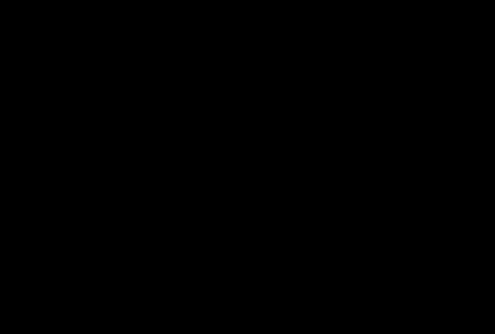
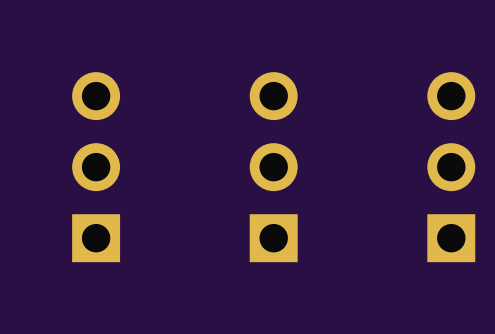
part: none -> (96, 167)
part: none -> (273, 167)
part: none -> (451, 167)

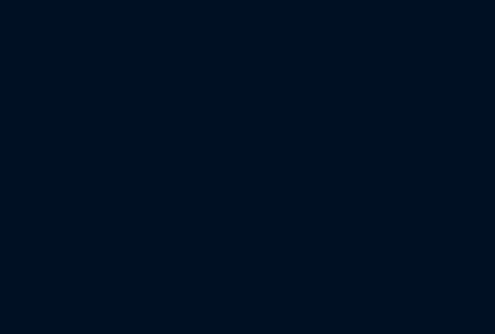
part: (96, 167) -> none
part: (273, 167) -> none
part: (451, 167) -> none

